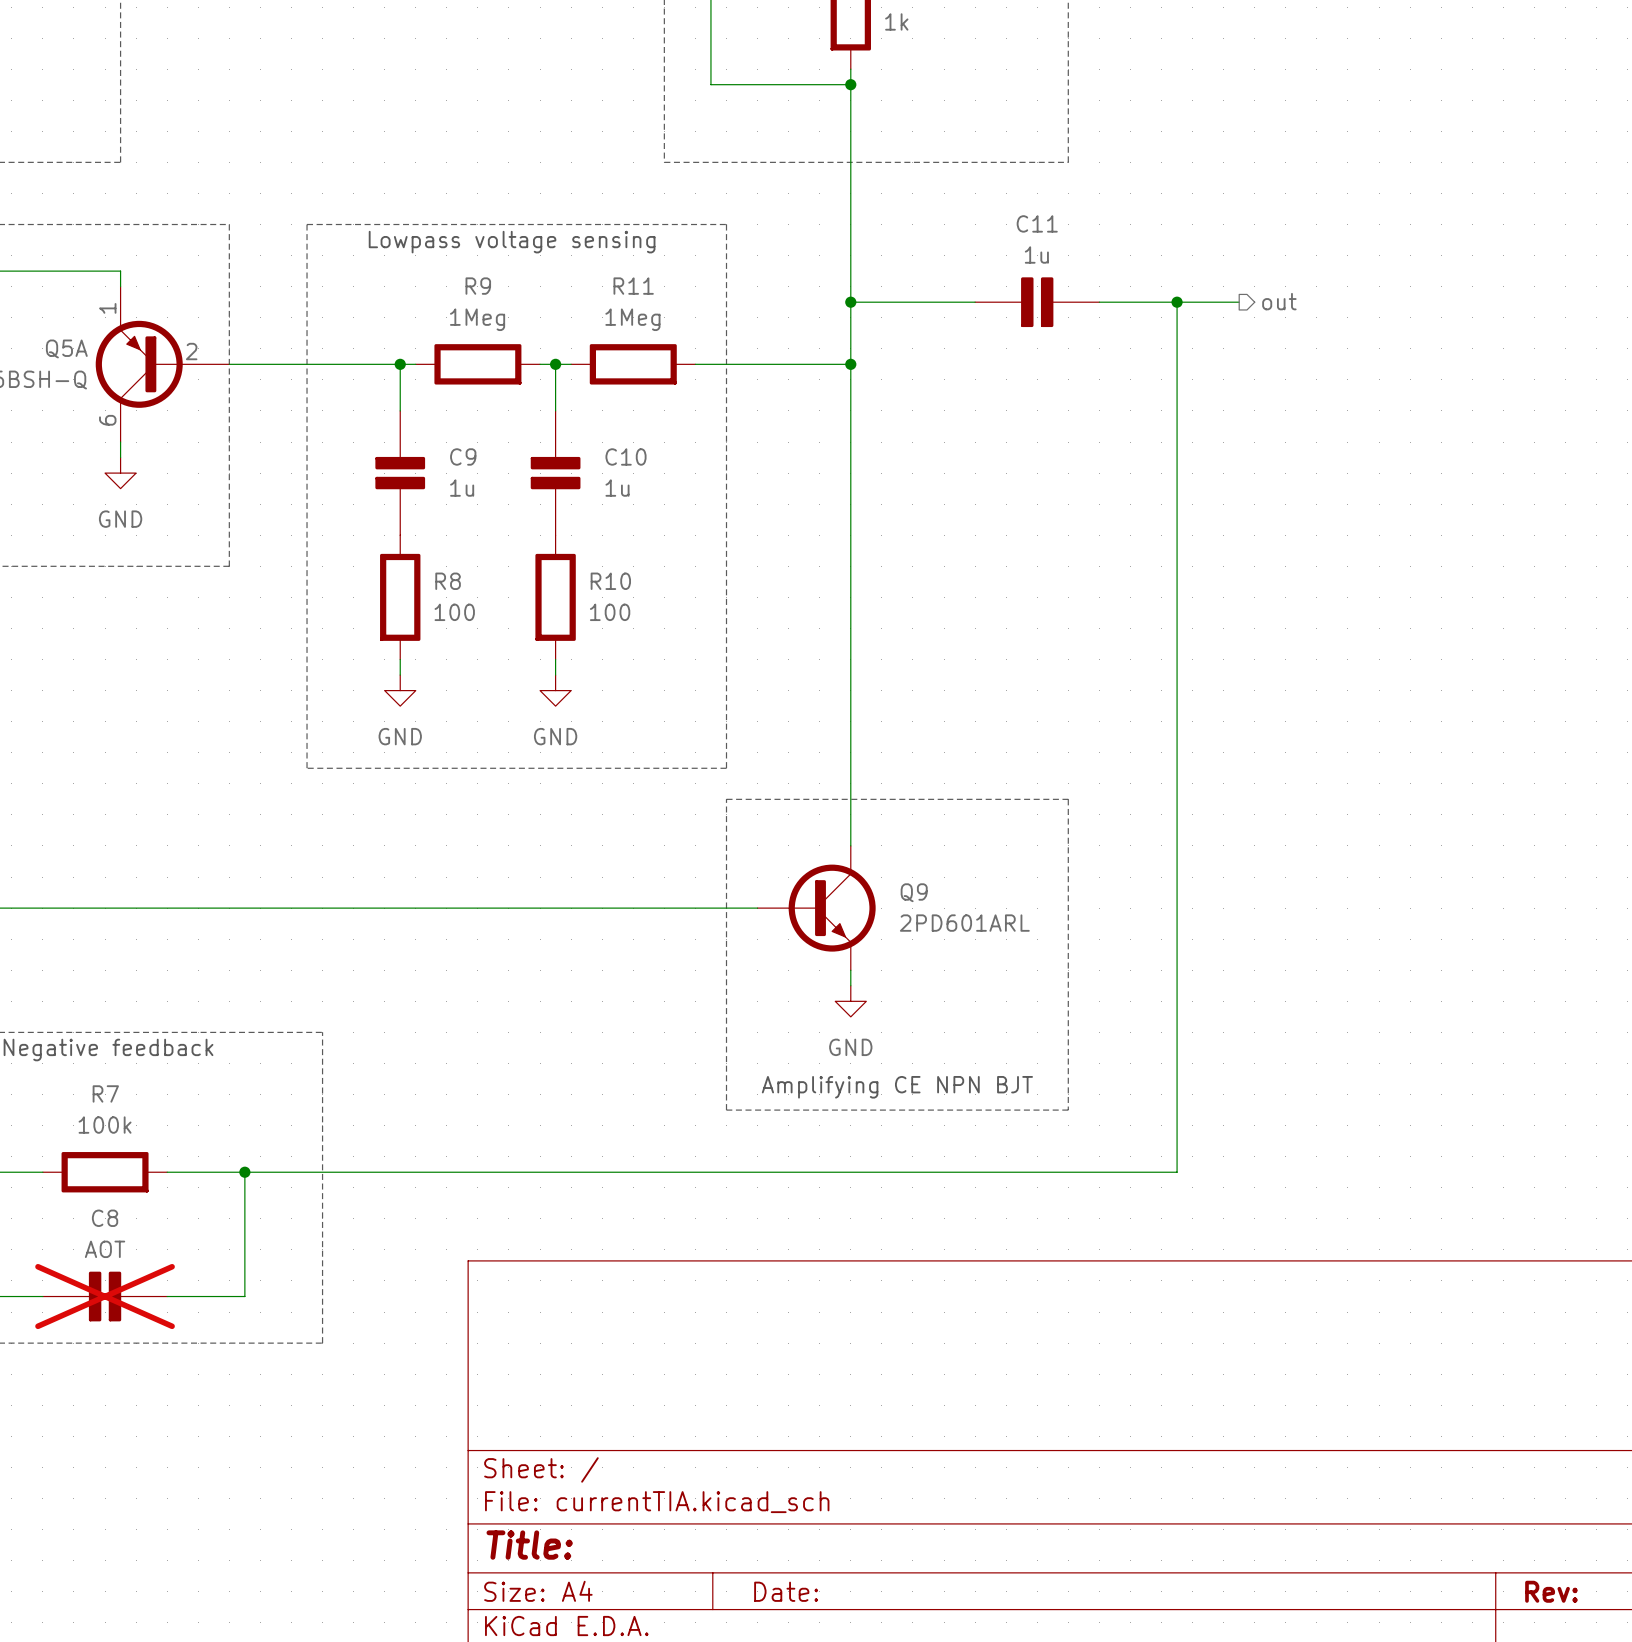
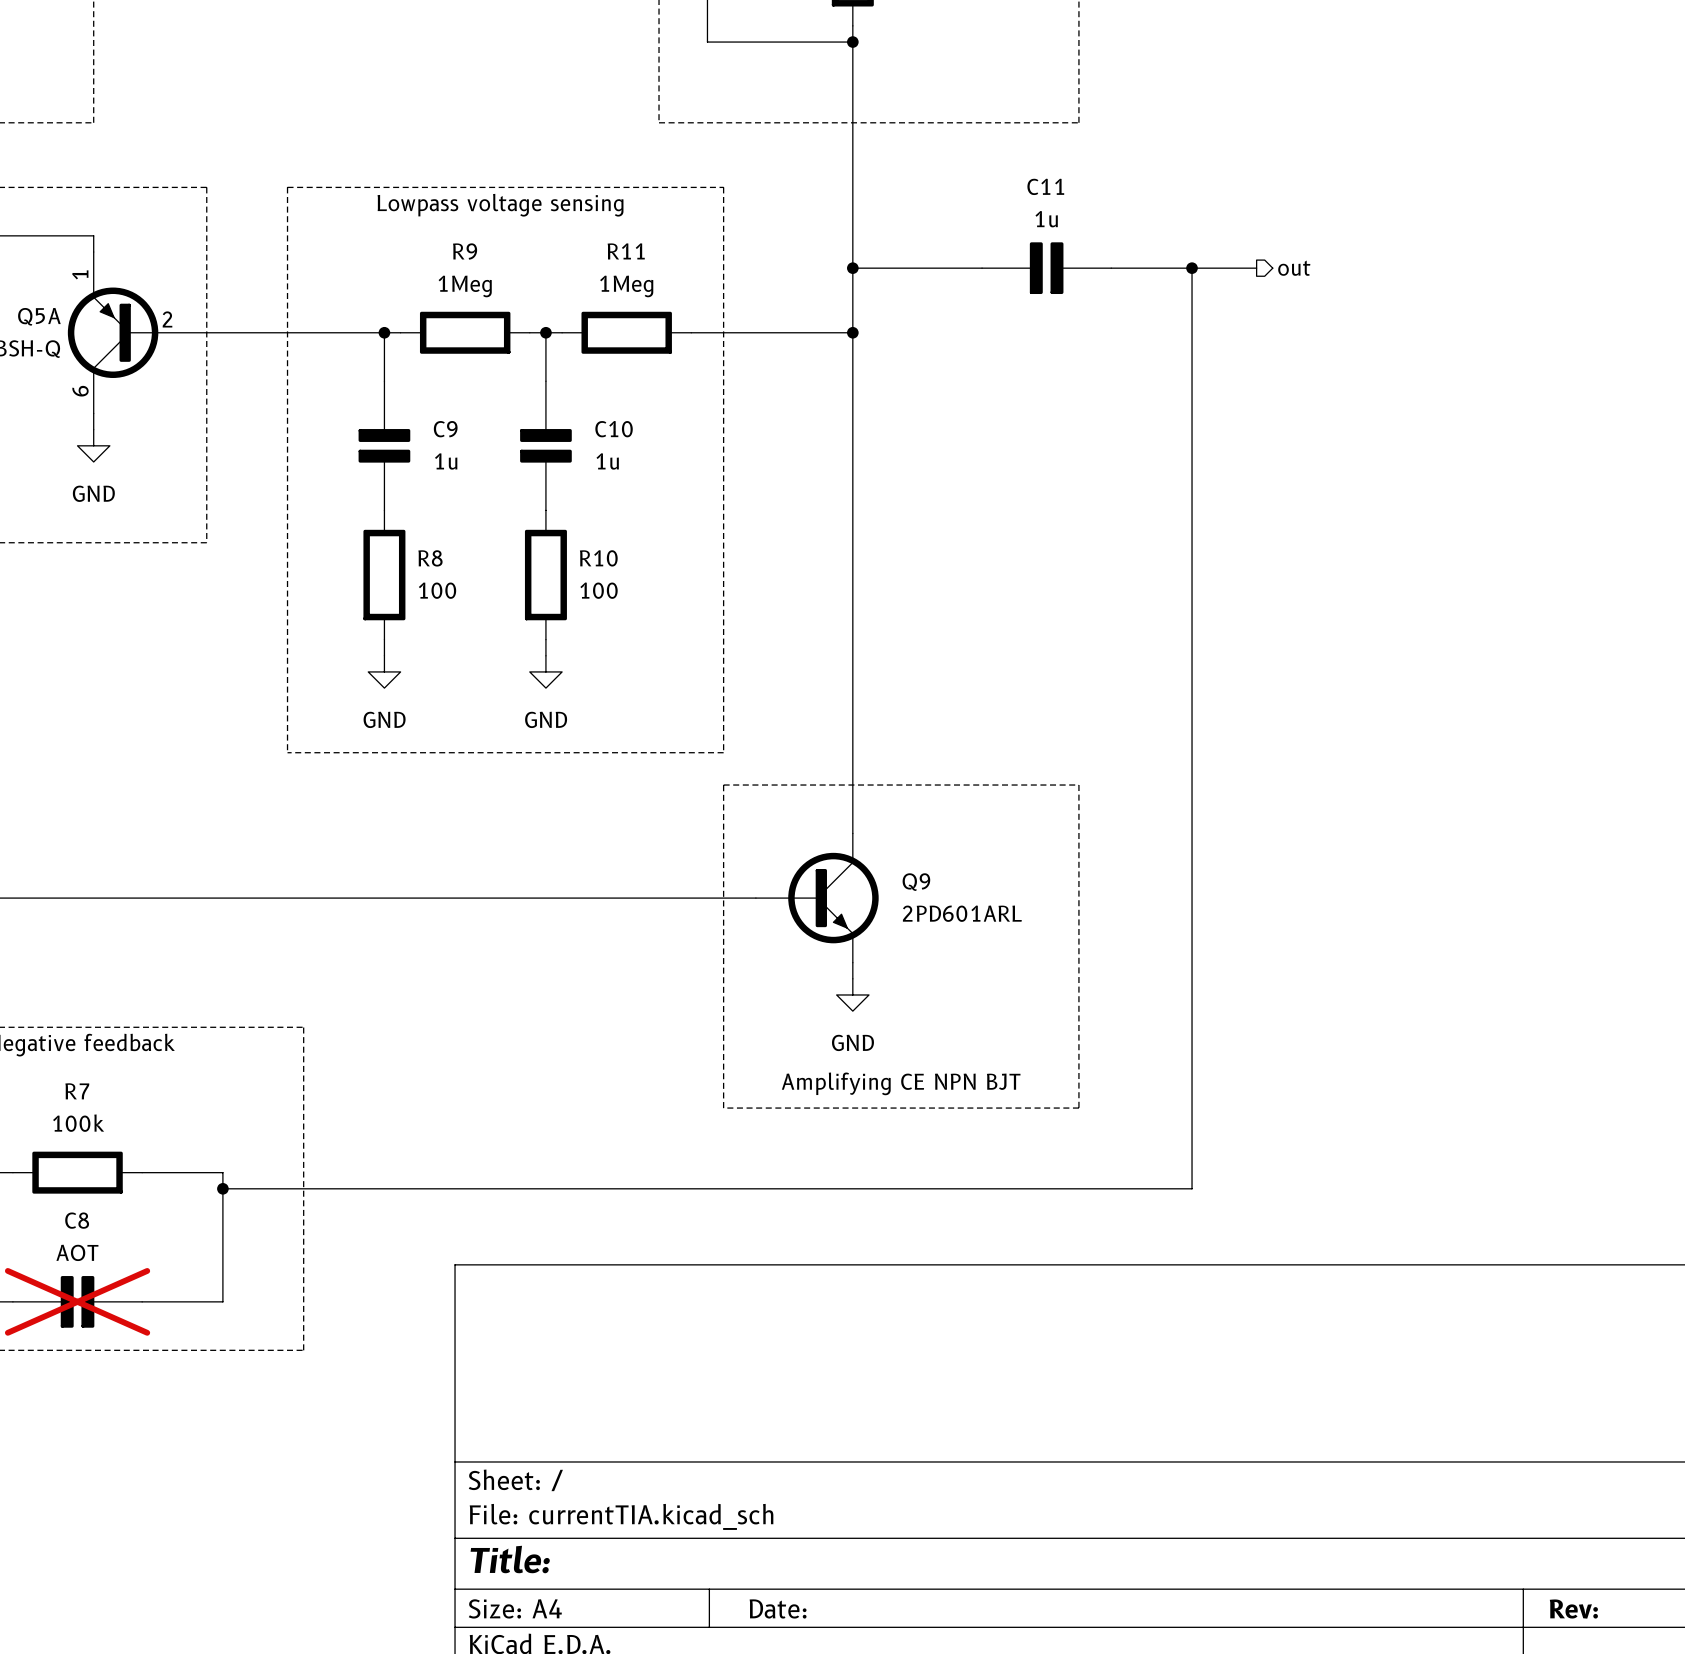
wire: (244, 1172) (1177, 1172) -> (222, 1188) (1192, 1188) (1192, 1172)
junction position: (244, 1172) -> (222, 1188)

